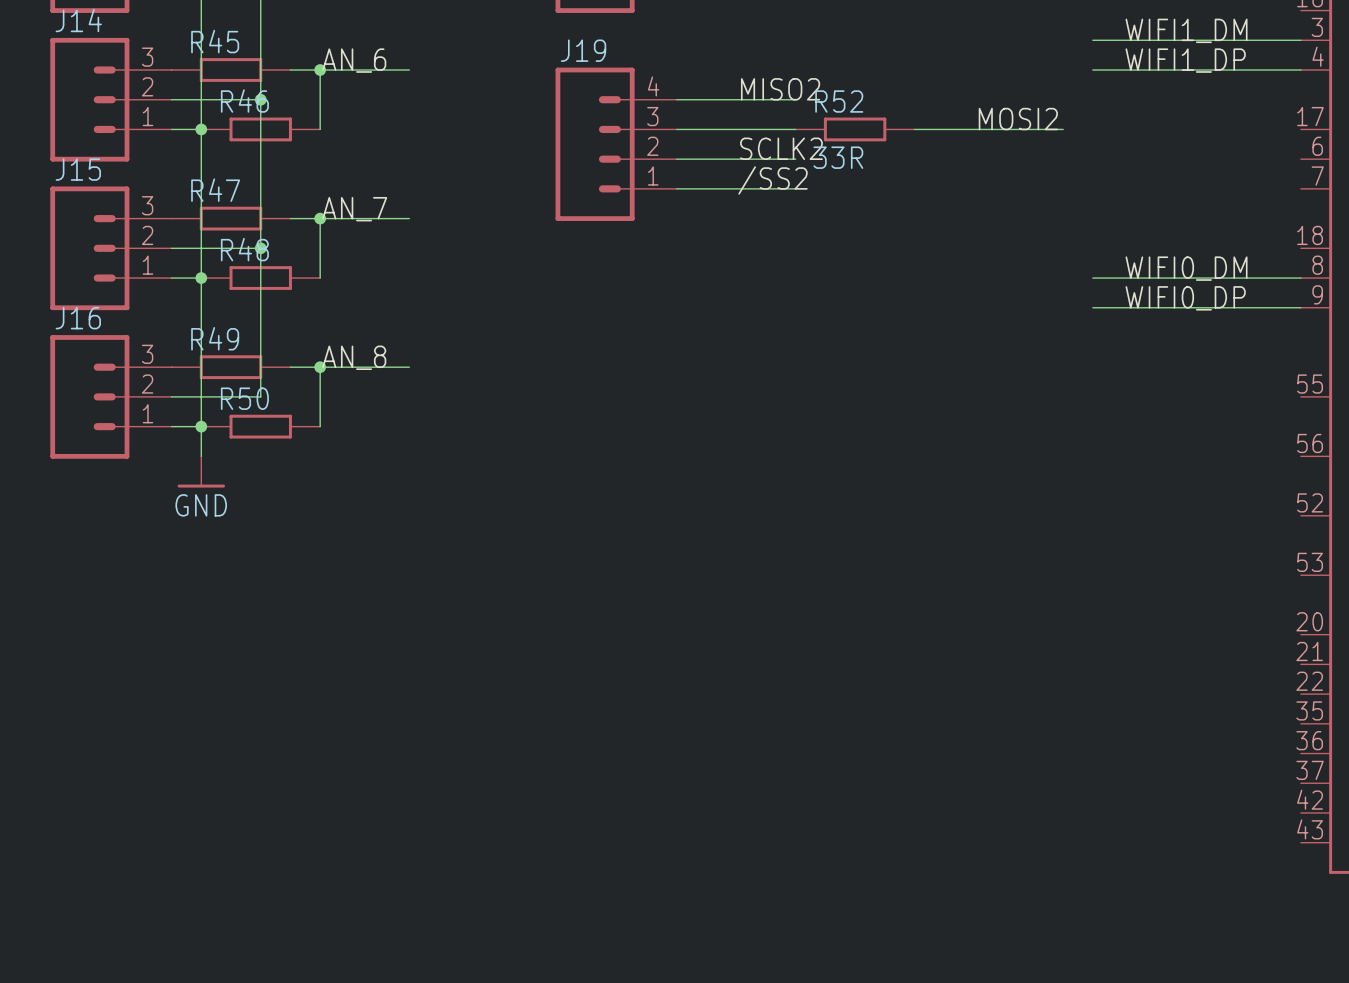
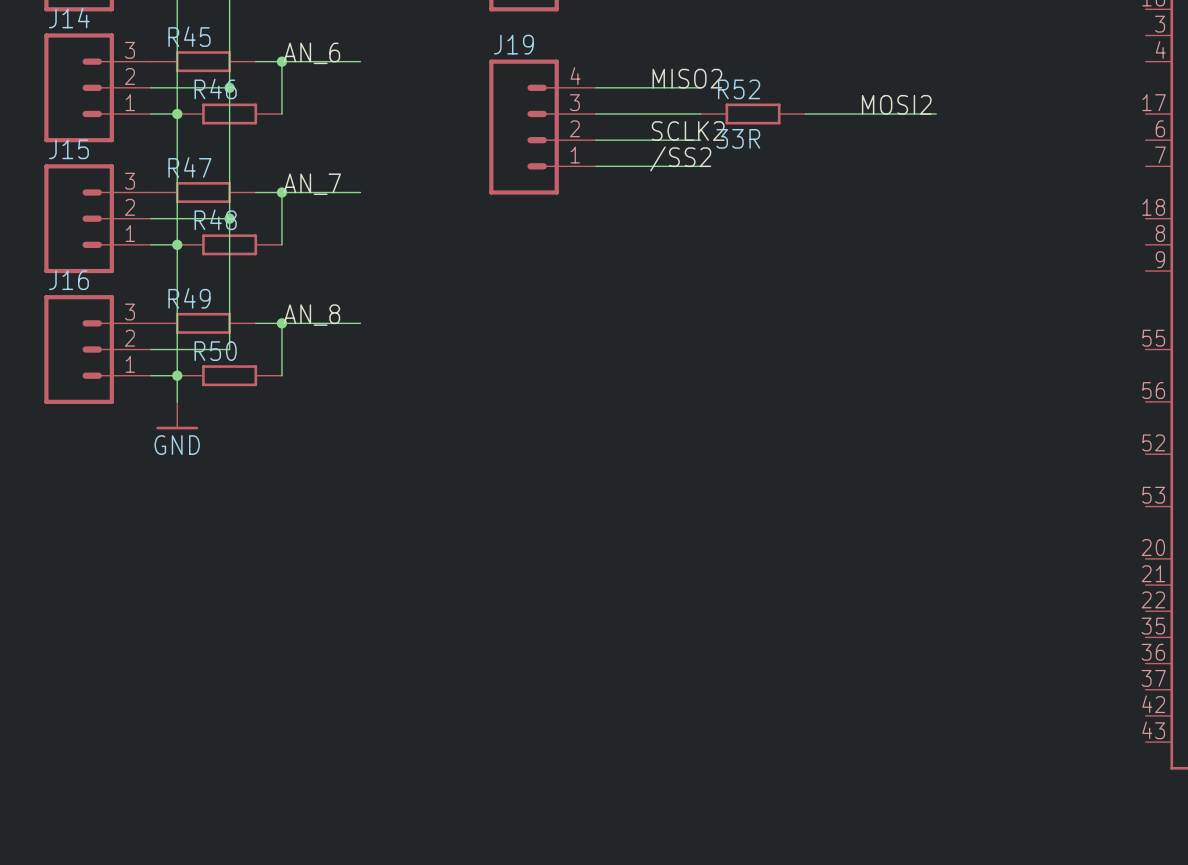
label: WIFI1_DM (1186, 30) -> none
wire: (1092, 40) (1300, 40) -> none
label: WIFI1_DP (1185, 60) -> none
wire: (1092, 70) (1300, 70) -> none
label: WIFI0_DM (1186, 268) -> none
wire: (1092, 278) (1300, 278) -> none
label: WIFI0_DP (1185, 298) -> none
wire: (1092, 307) (1300, 307) -> none

